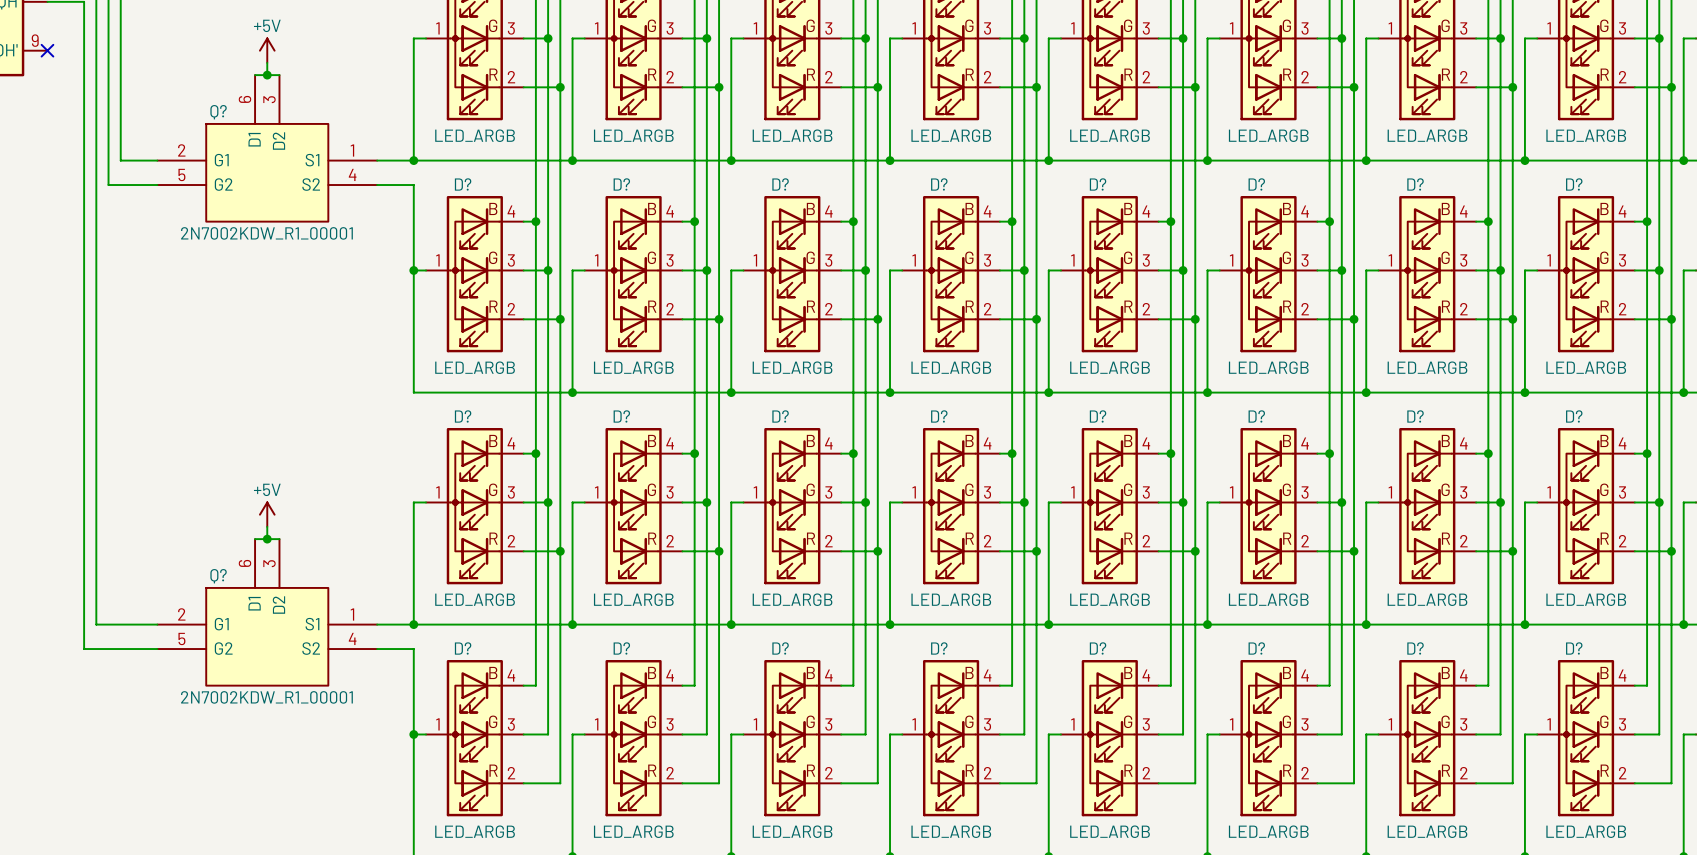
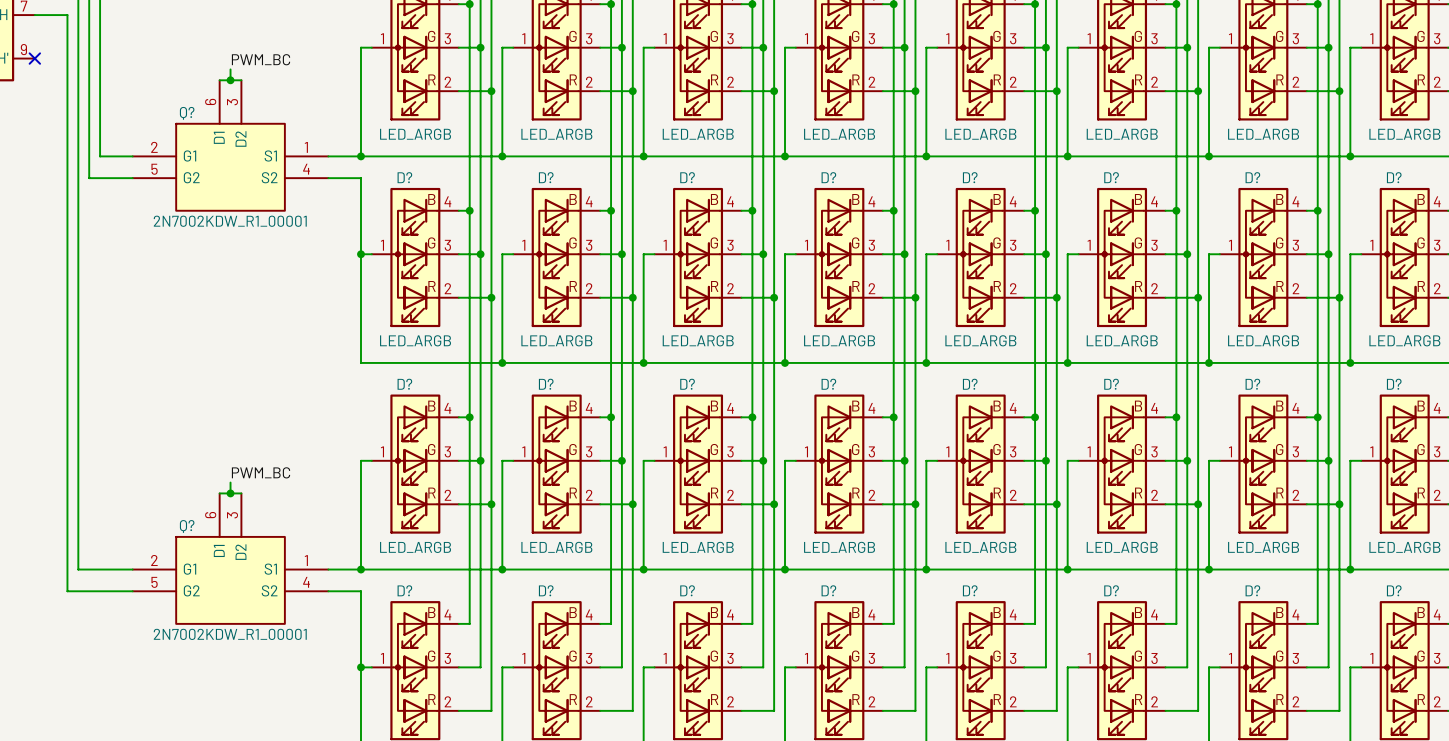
power symbol: +5V (267, 50) -> none
label: none -> PWM_BC (261, 59)
power symbol: +5V (267, 514) -> none
label: none -> PWM_BC (261, 472)

